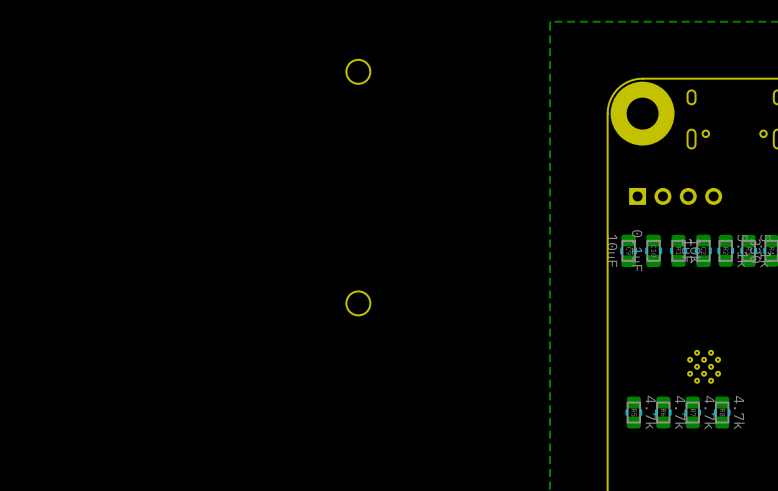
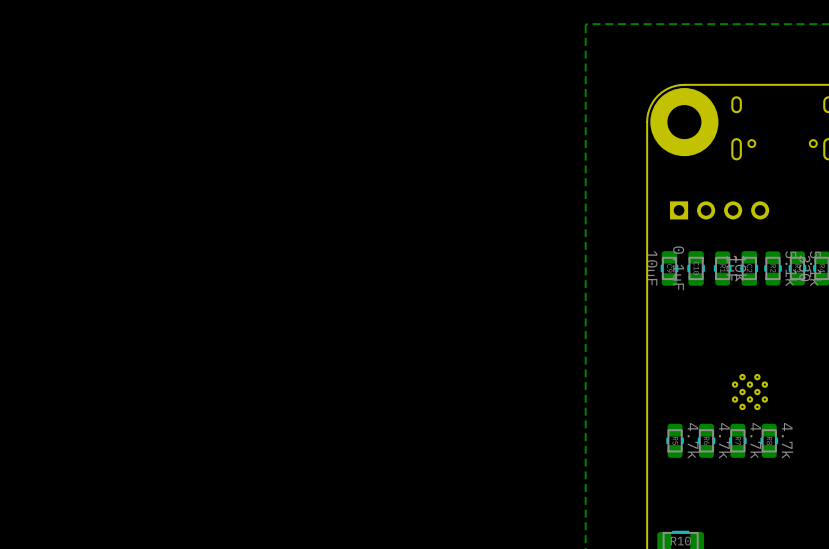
round board edge: [346, 59, 371, 85] -> none
round board edge: [346, 291, 371, 316] -> none

